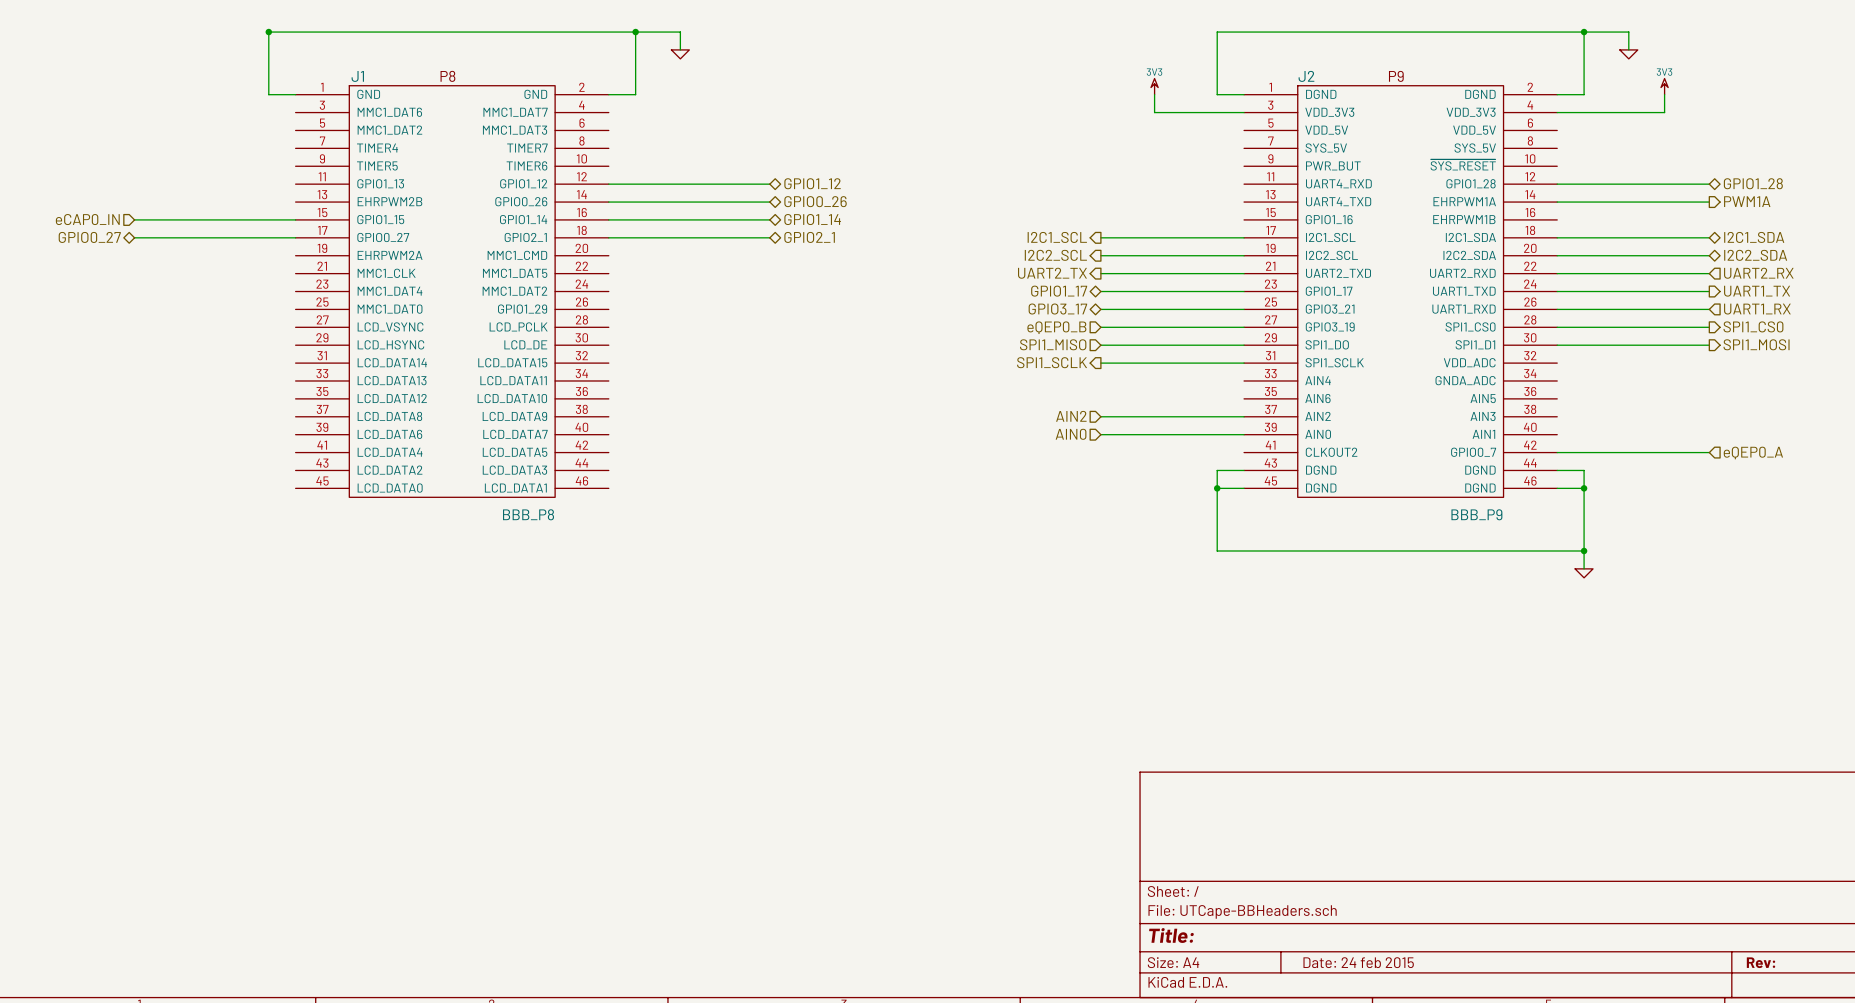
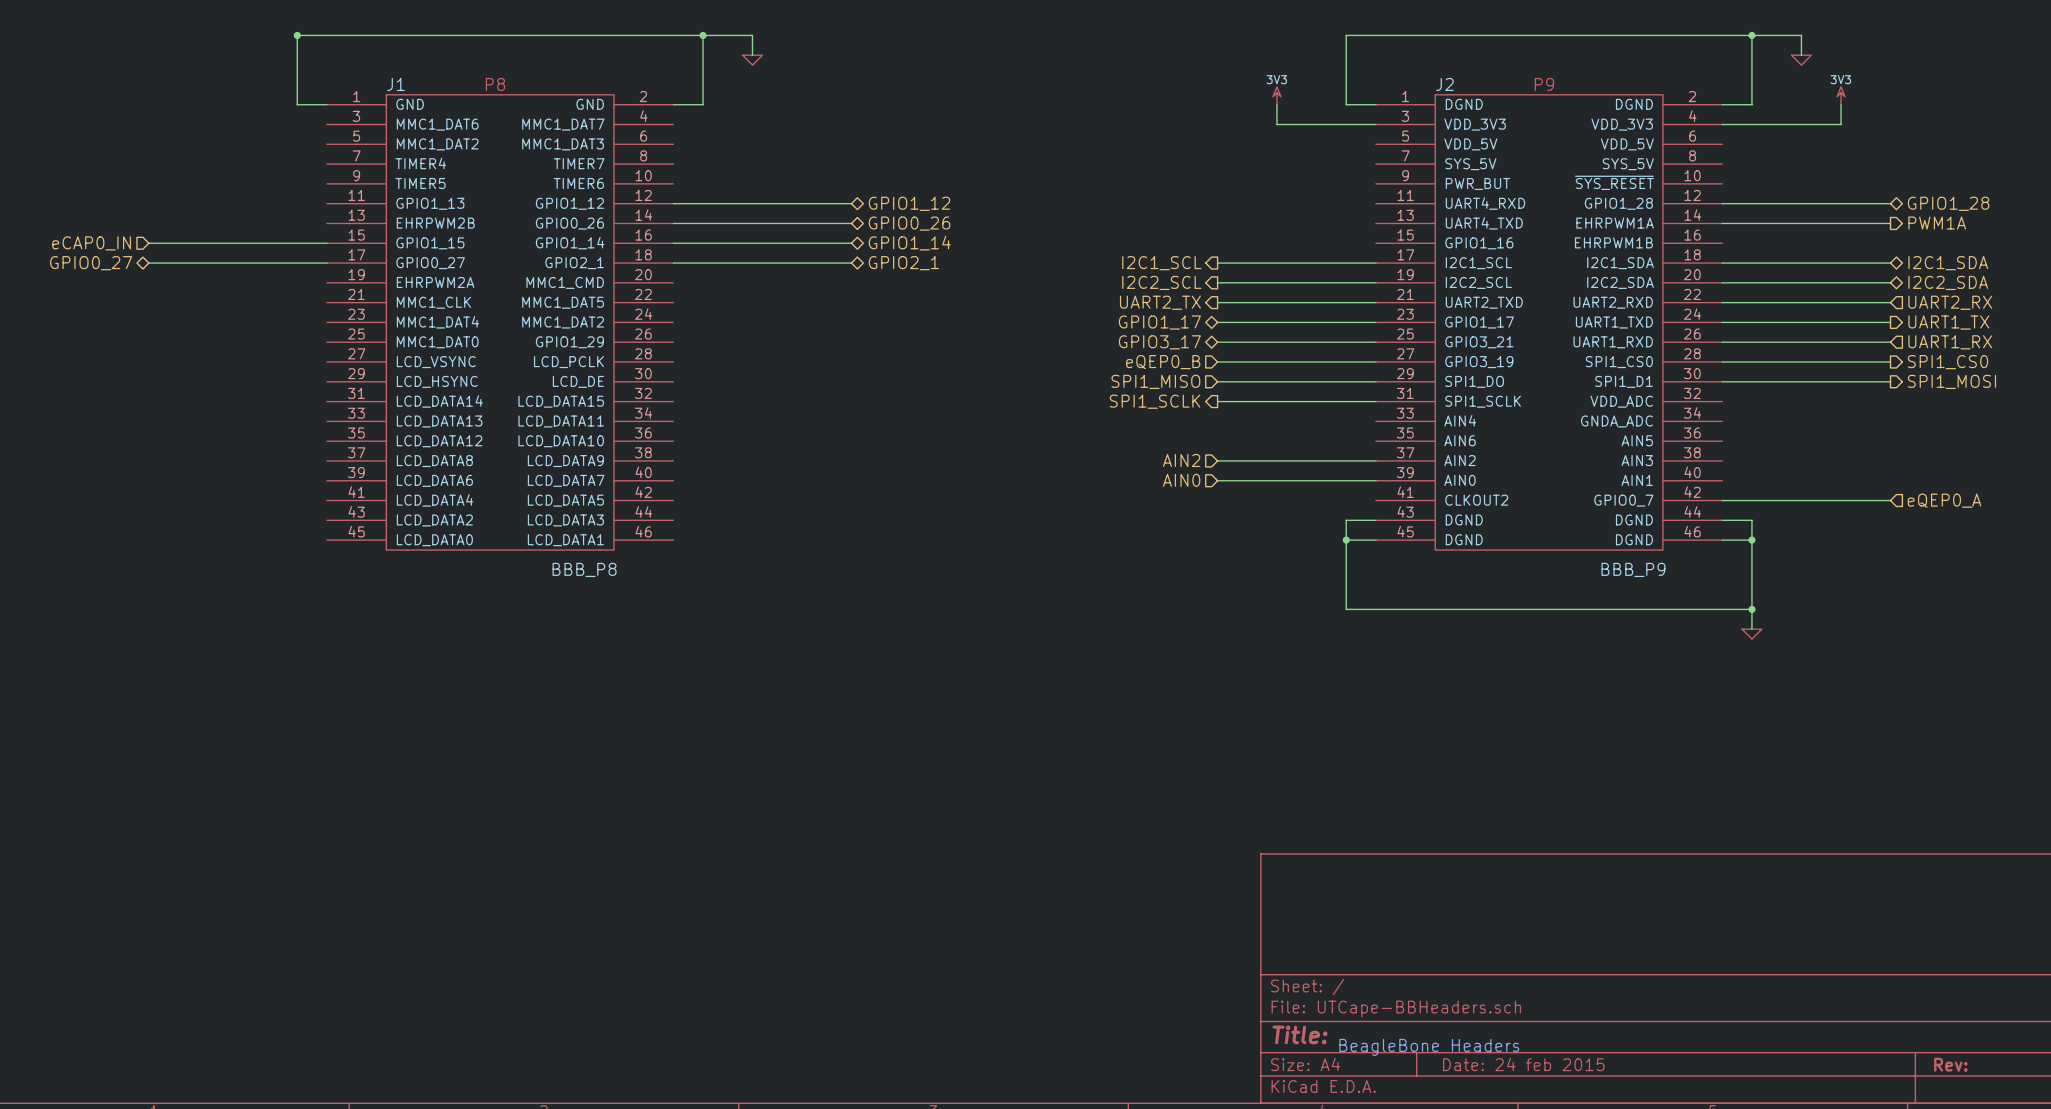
text: none -> BeagleBone Headers (1429, 1047)

